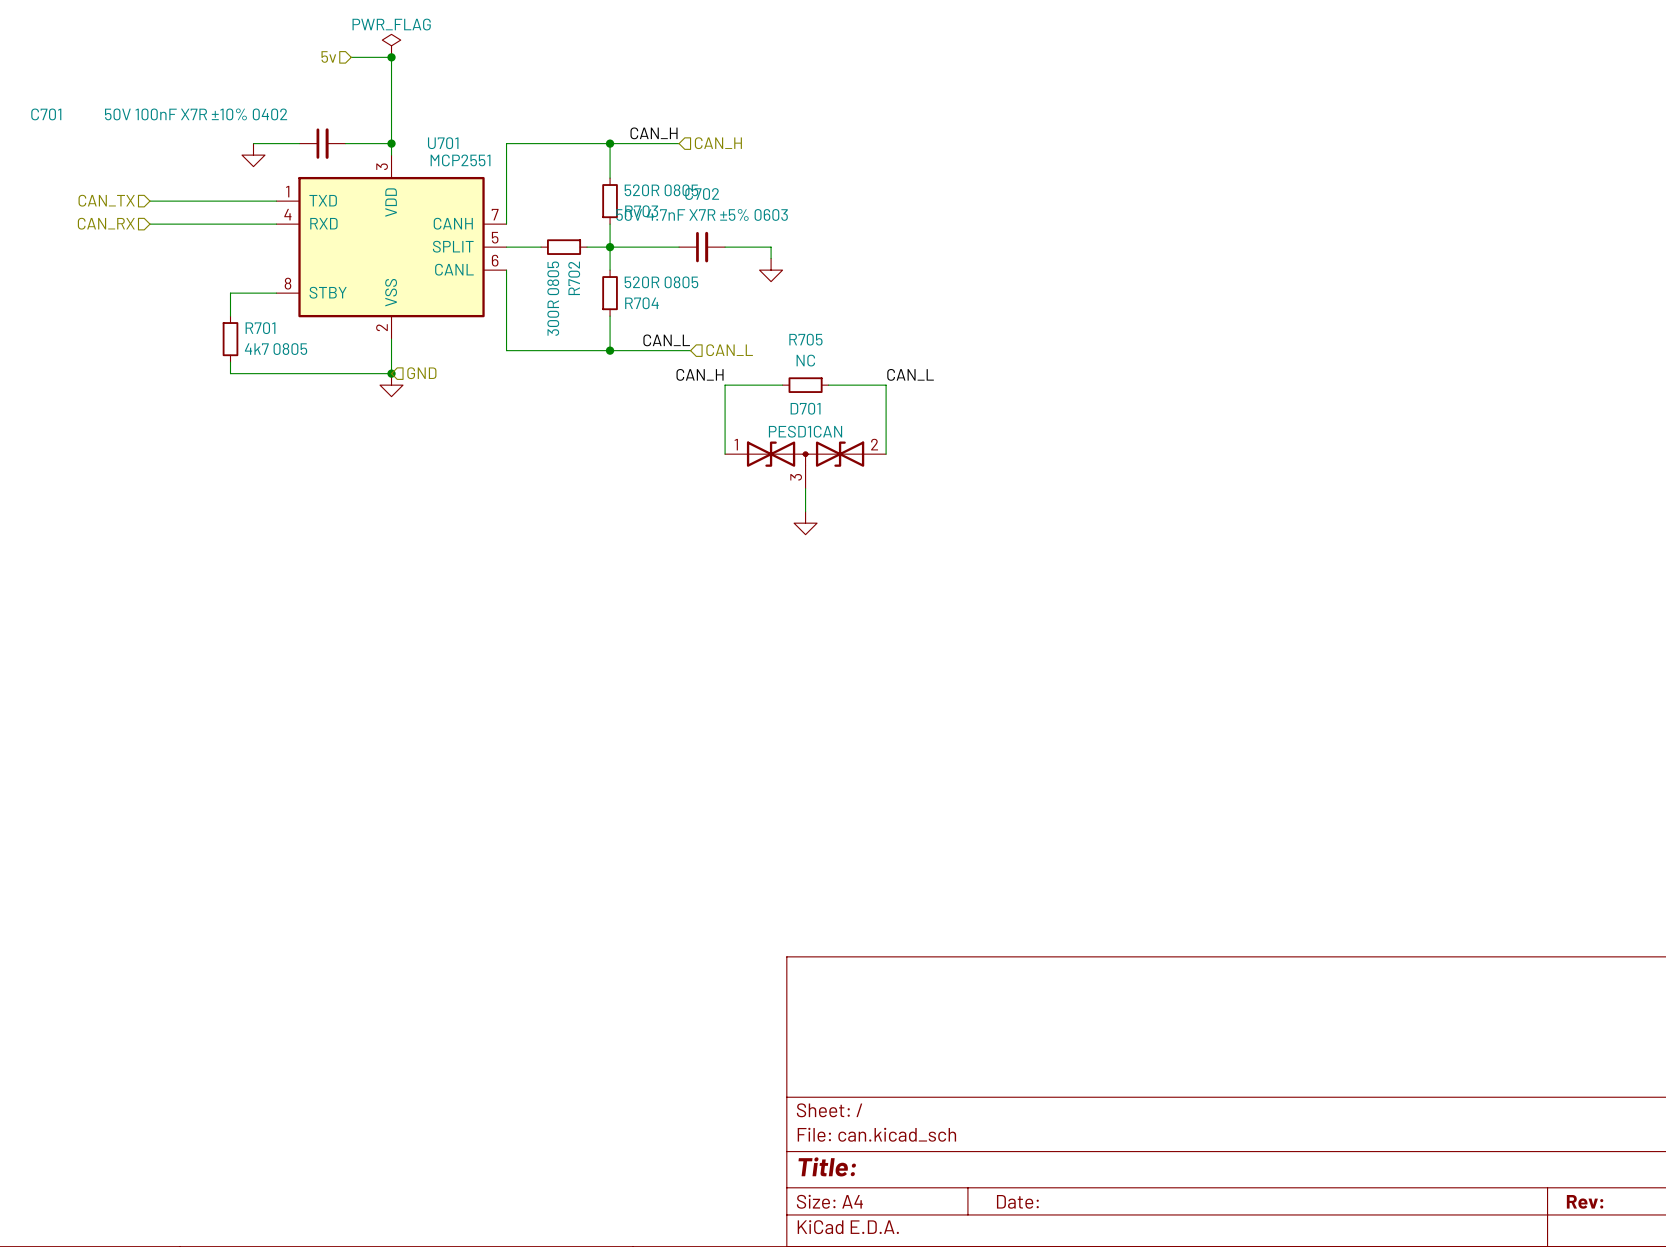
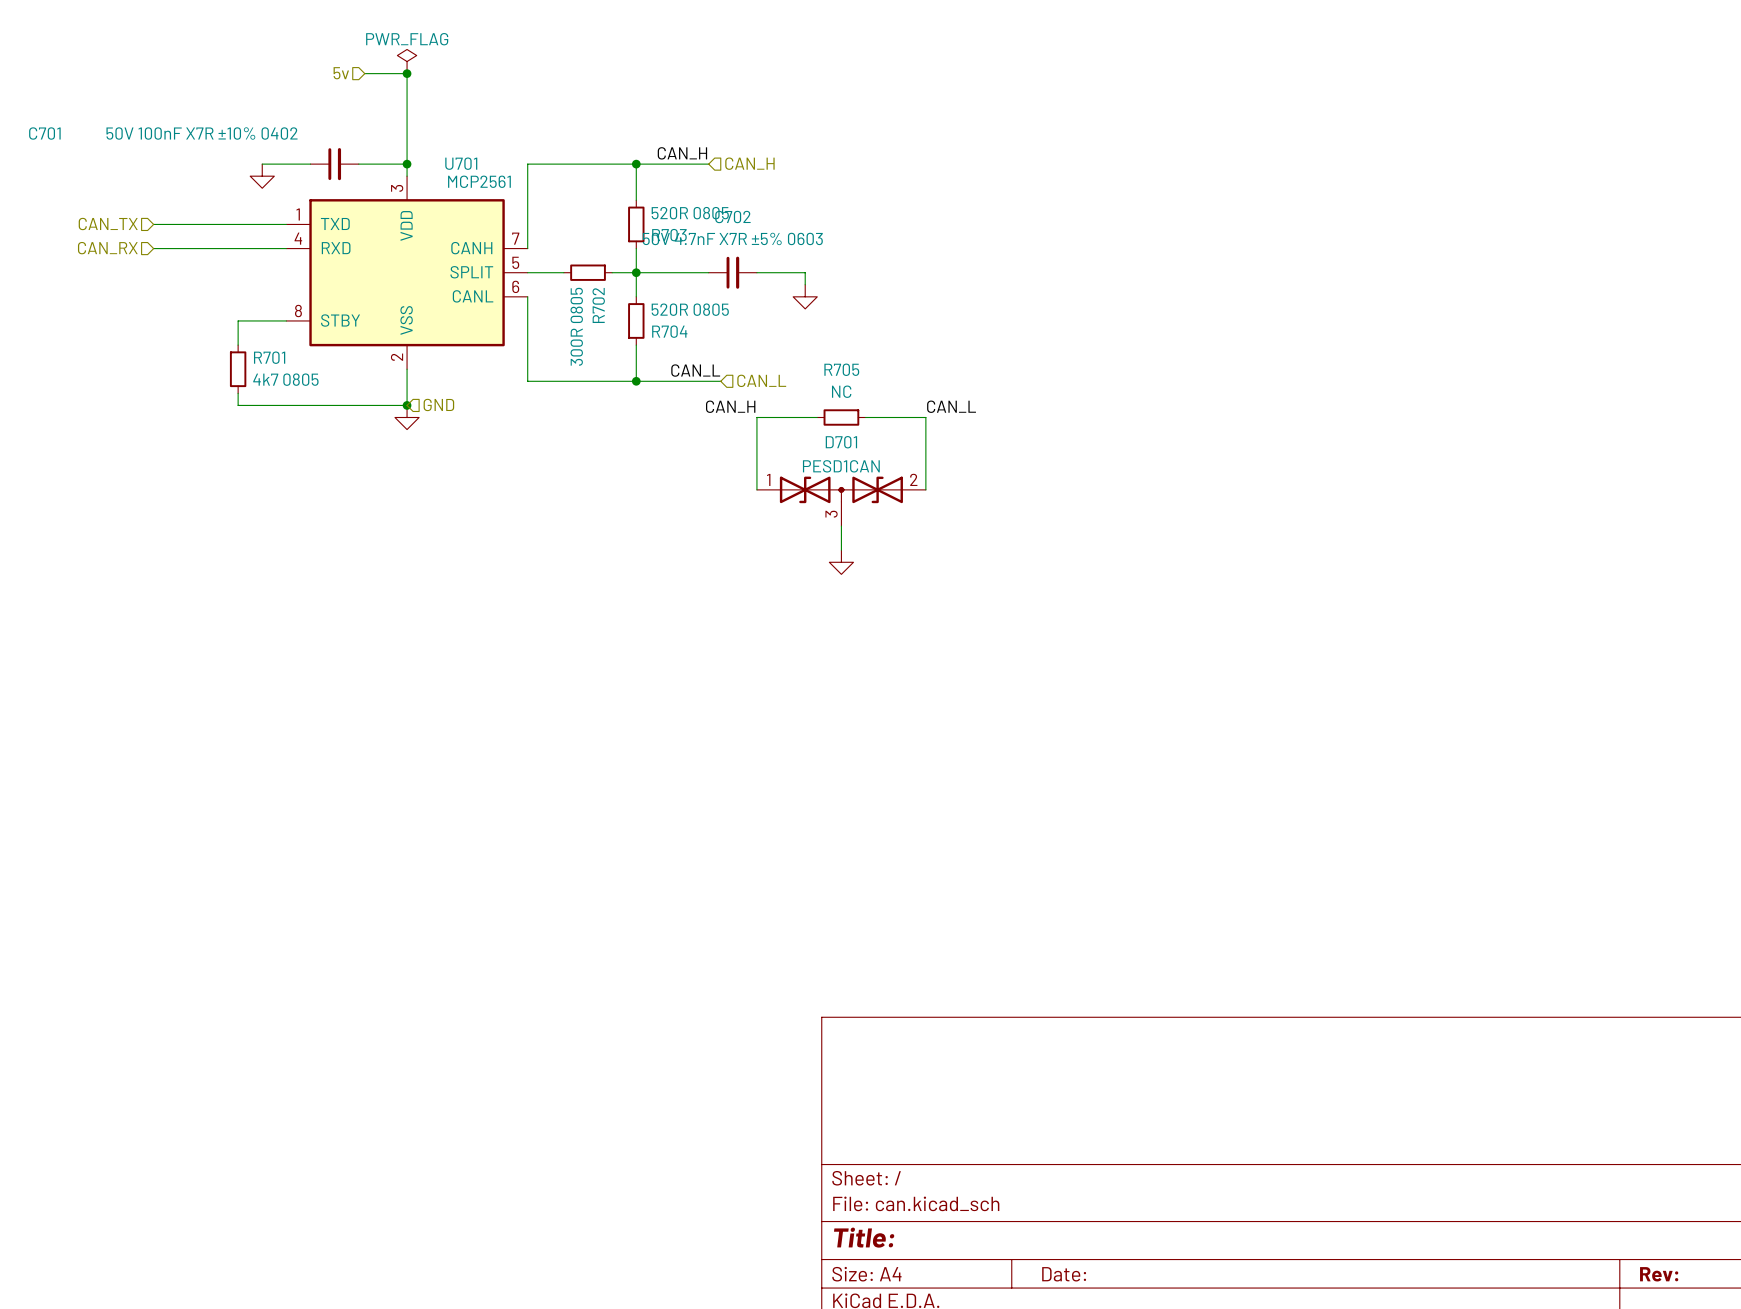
U701 value: MCP2551 (460, 160) -> MCP2561 (479, 181)

